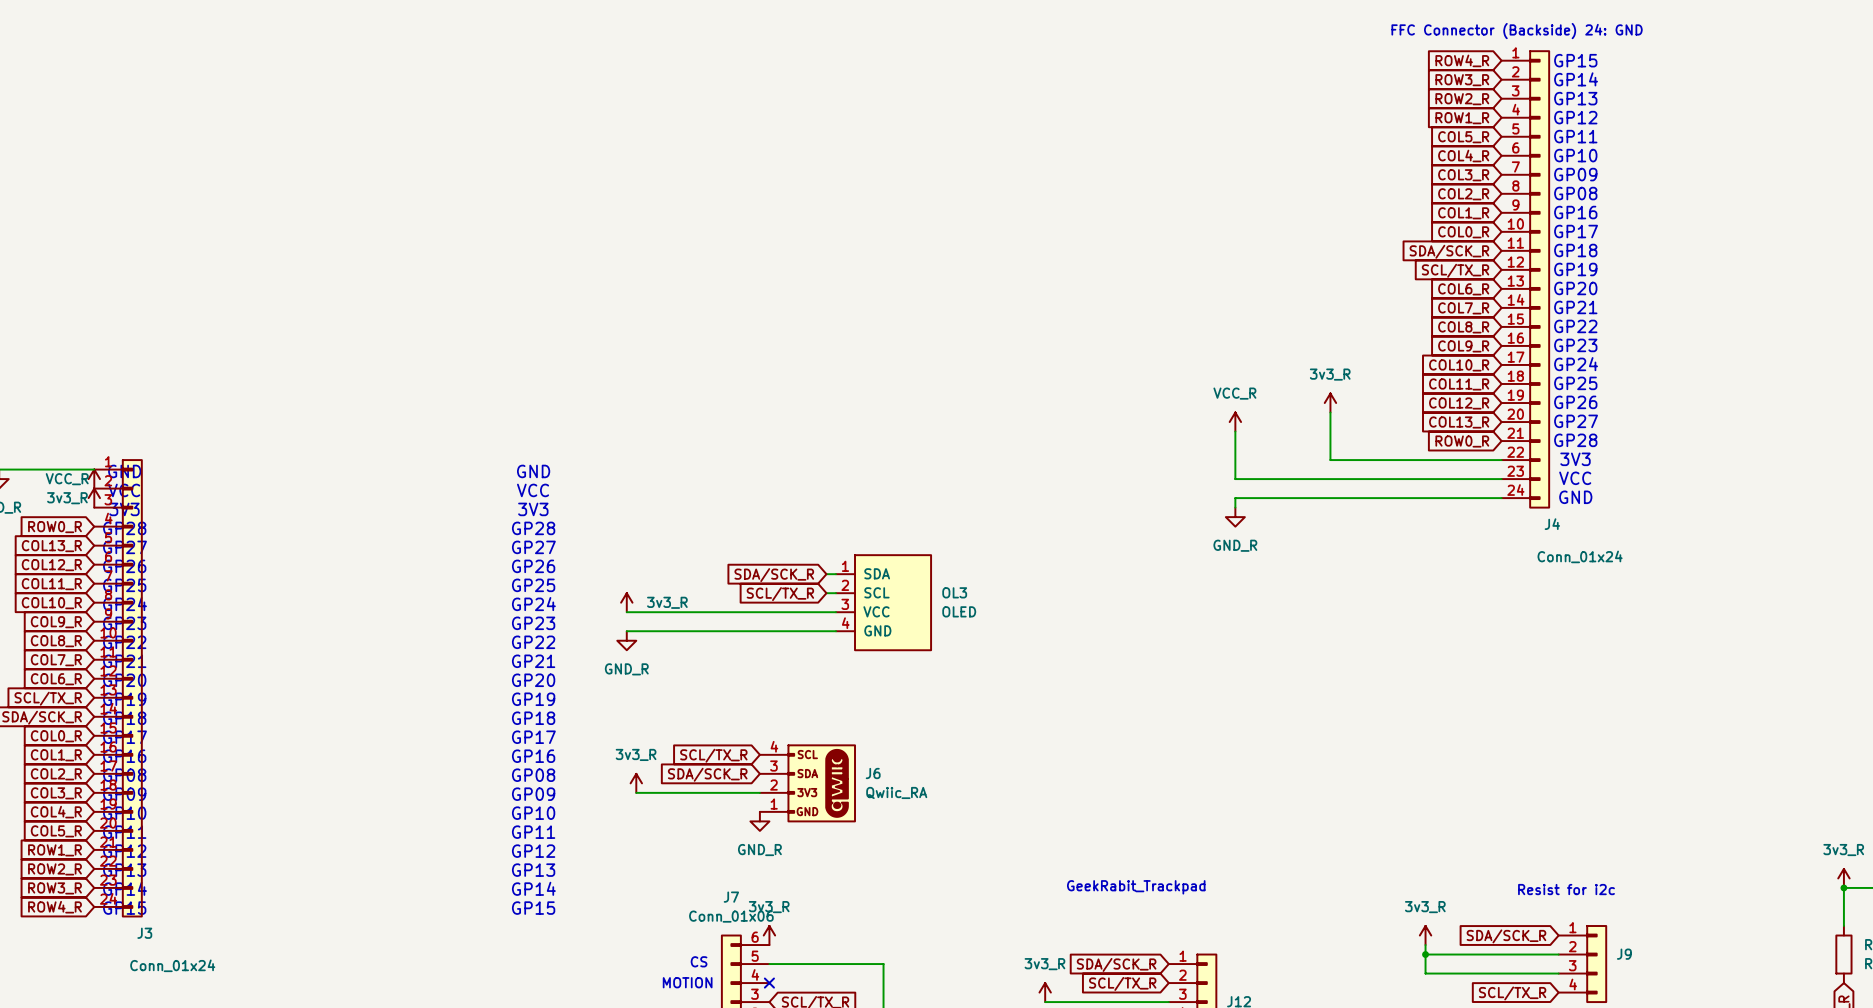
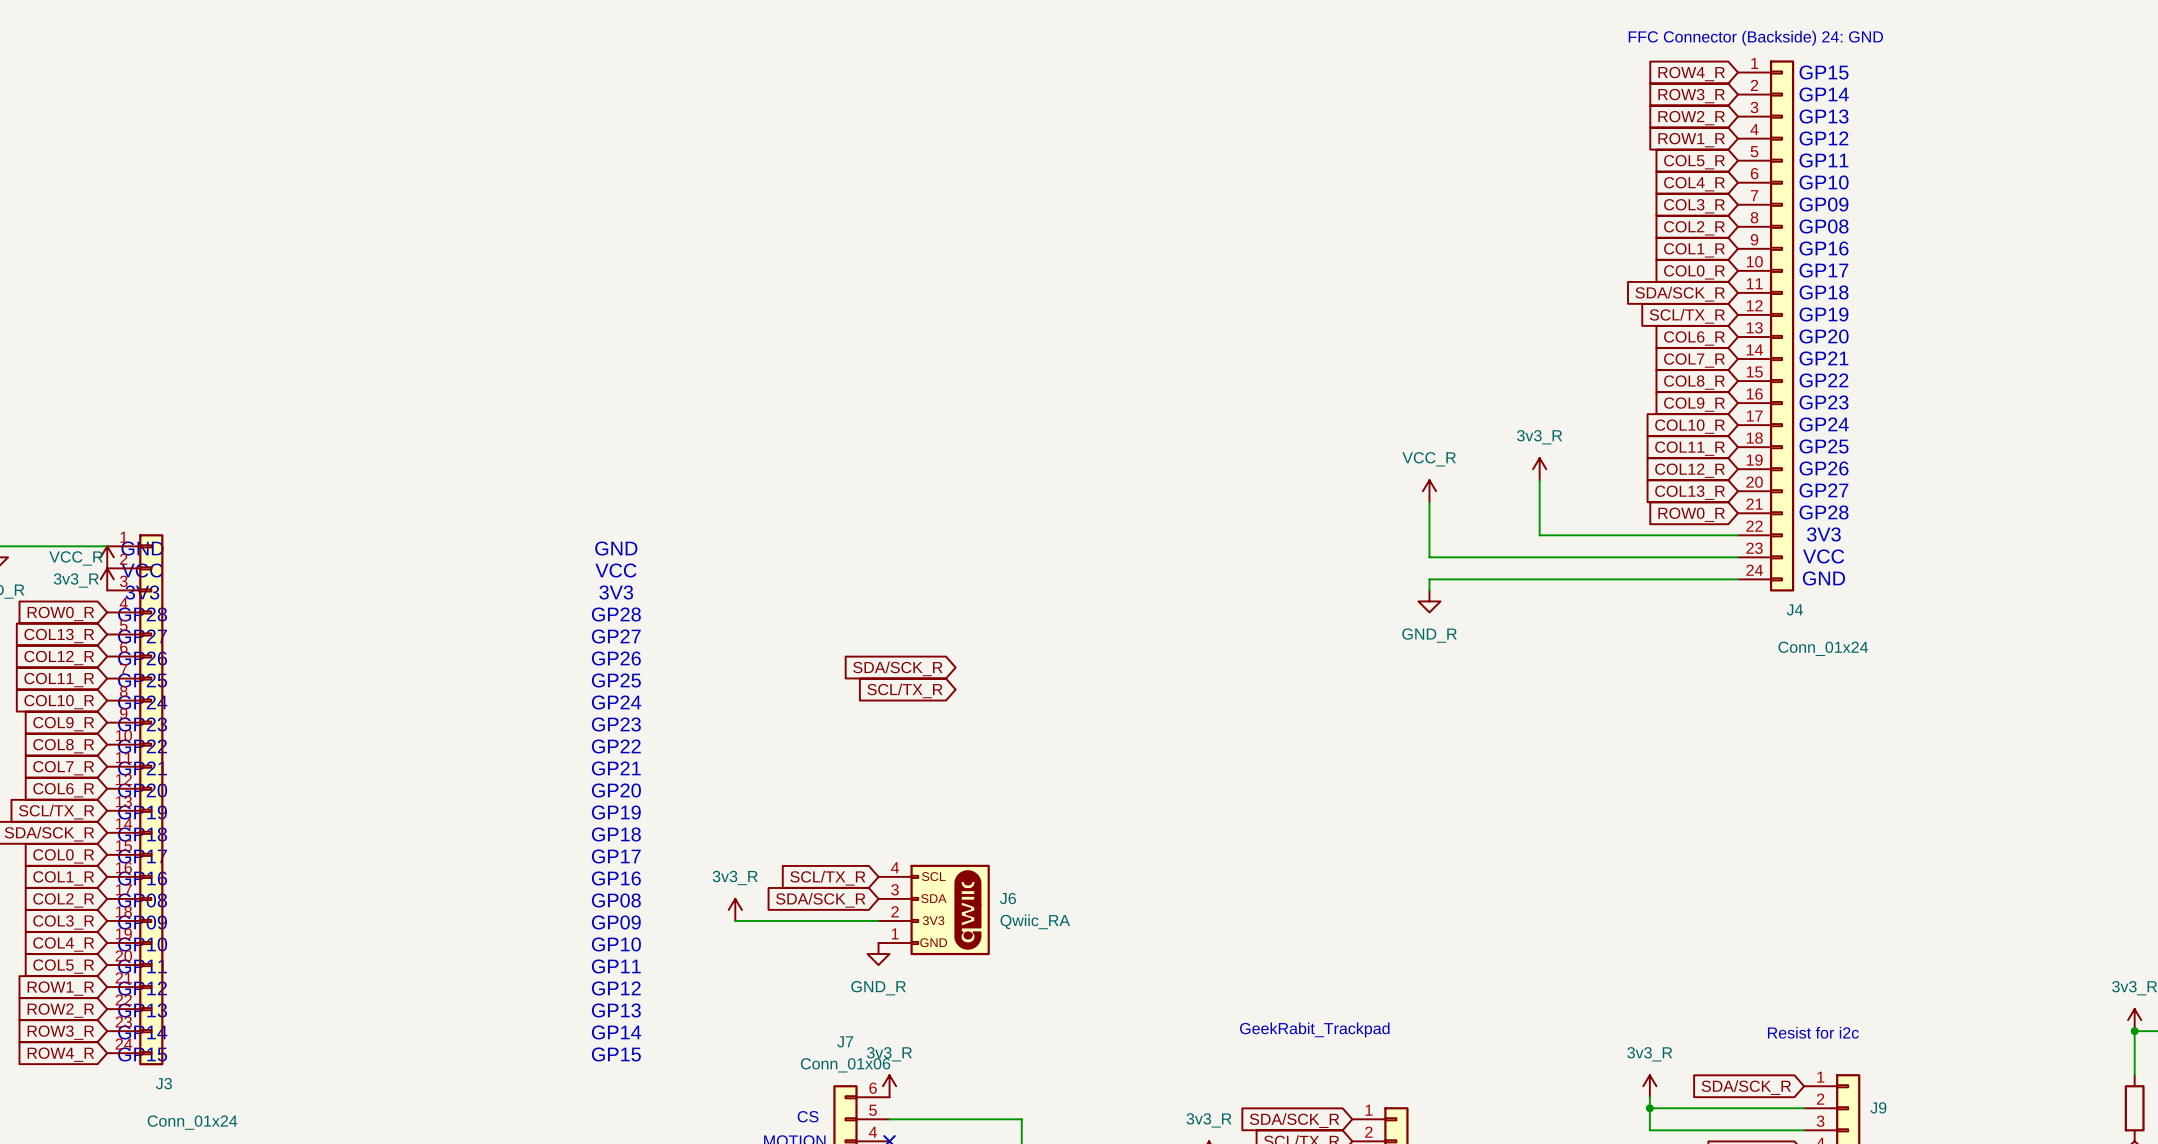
wire: (826, 574) (835, 574) -> none
wire: (826, 593) (835, 593) -> none
power symbol: 3v3_R (626, 602) -> none
OL3: OLED (884, 602) -> none
wire: (626, 612) (835, 612) -> none
wire: (626, 631) (835, 631) -> none
power symbol: GND_R (626, 640) -> none

